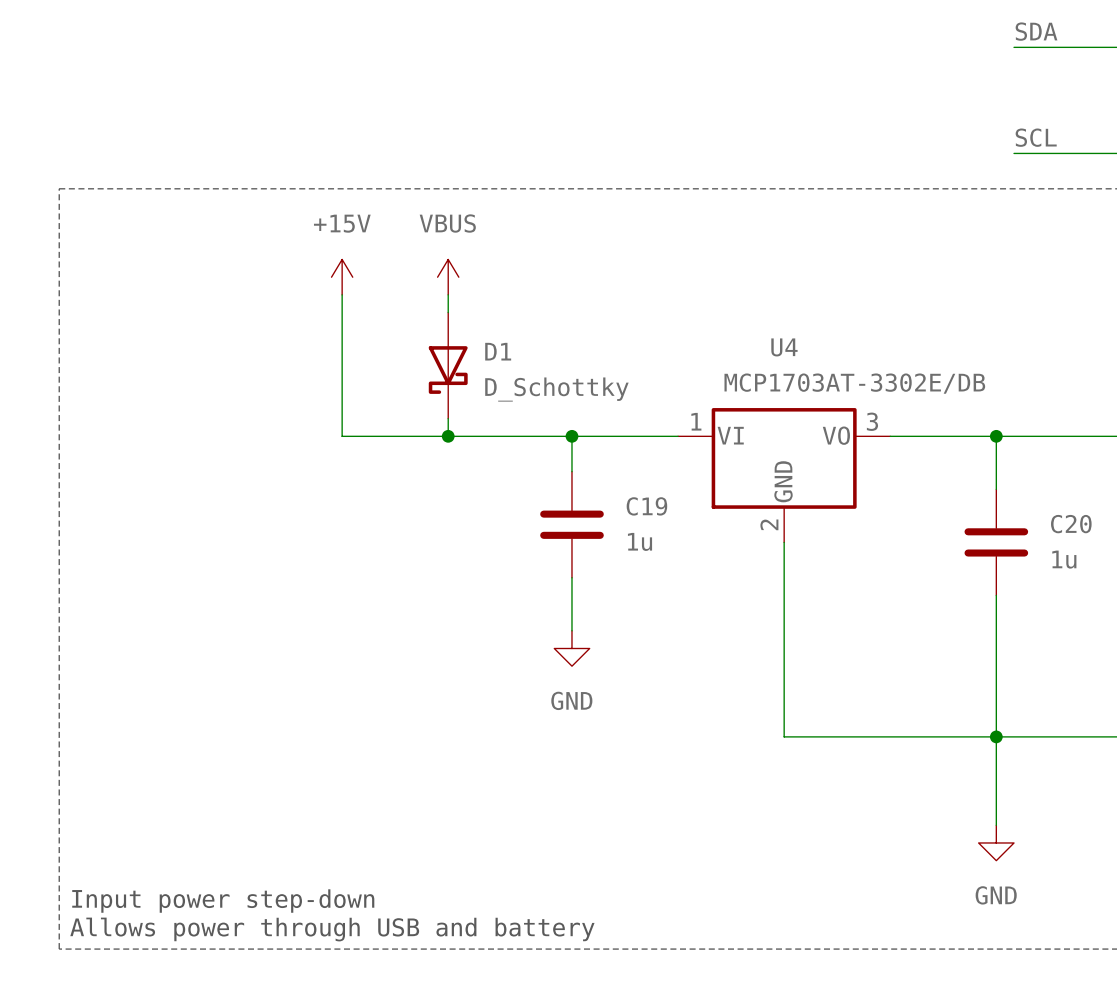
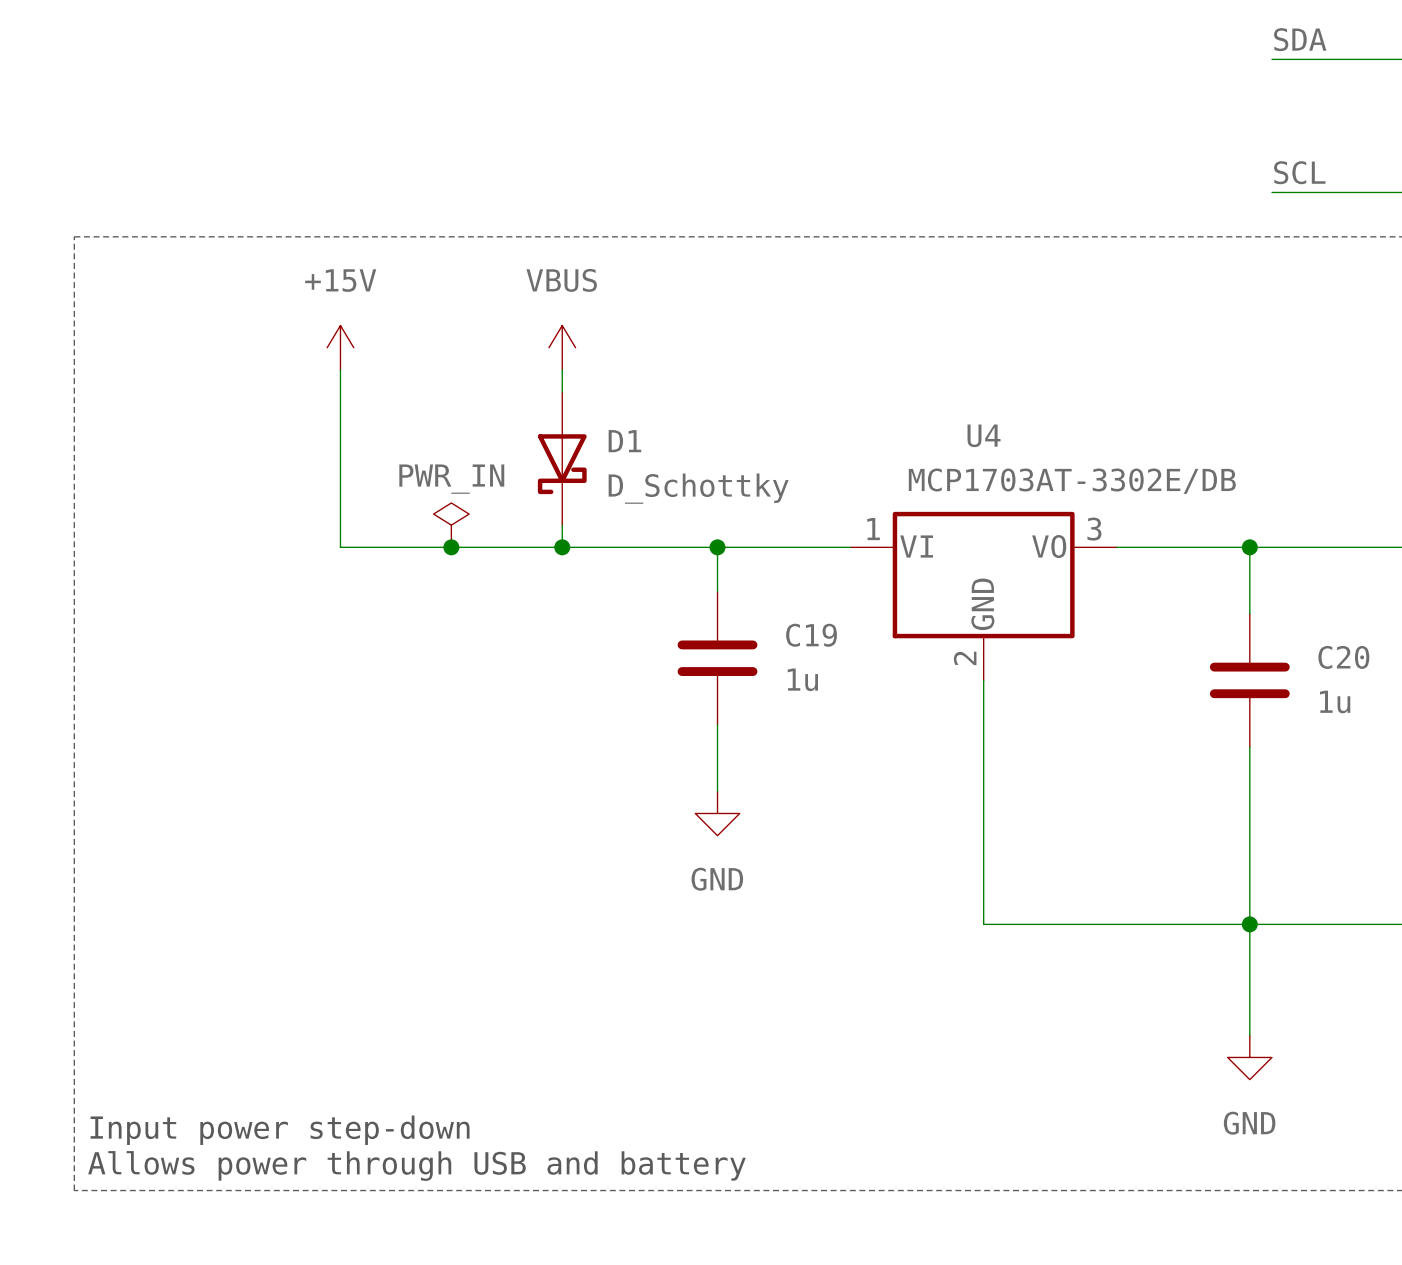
power symbol position: +15V (342, 277) -> +15V (340, 347)
wire: (342, 294) (342, 436) -> (340, 369) (340, 547) (429, 547)
power symbol: none -> PWR_IN (451, 525)
junction: none -> (451, 547)

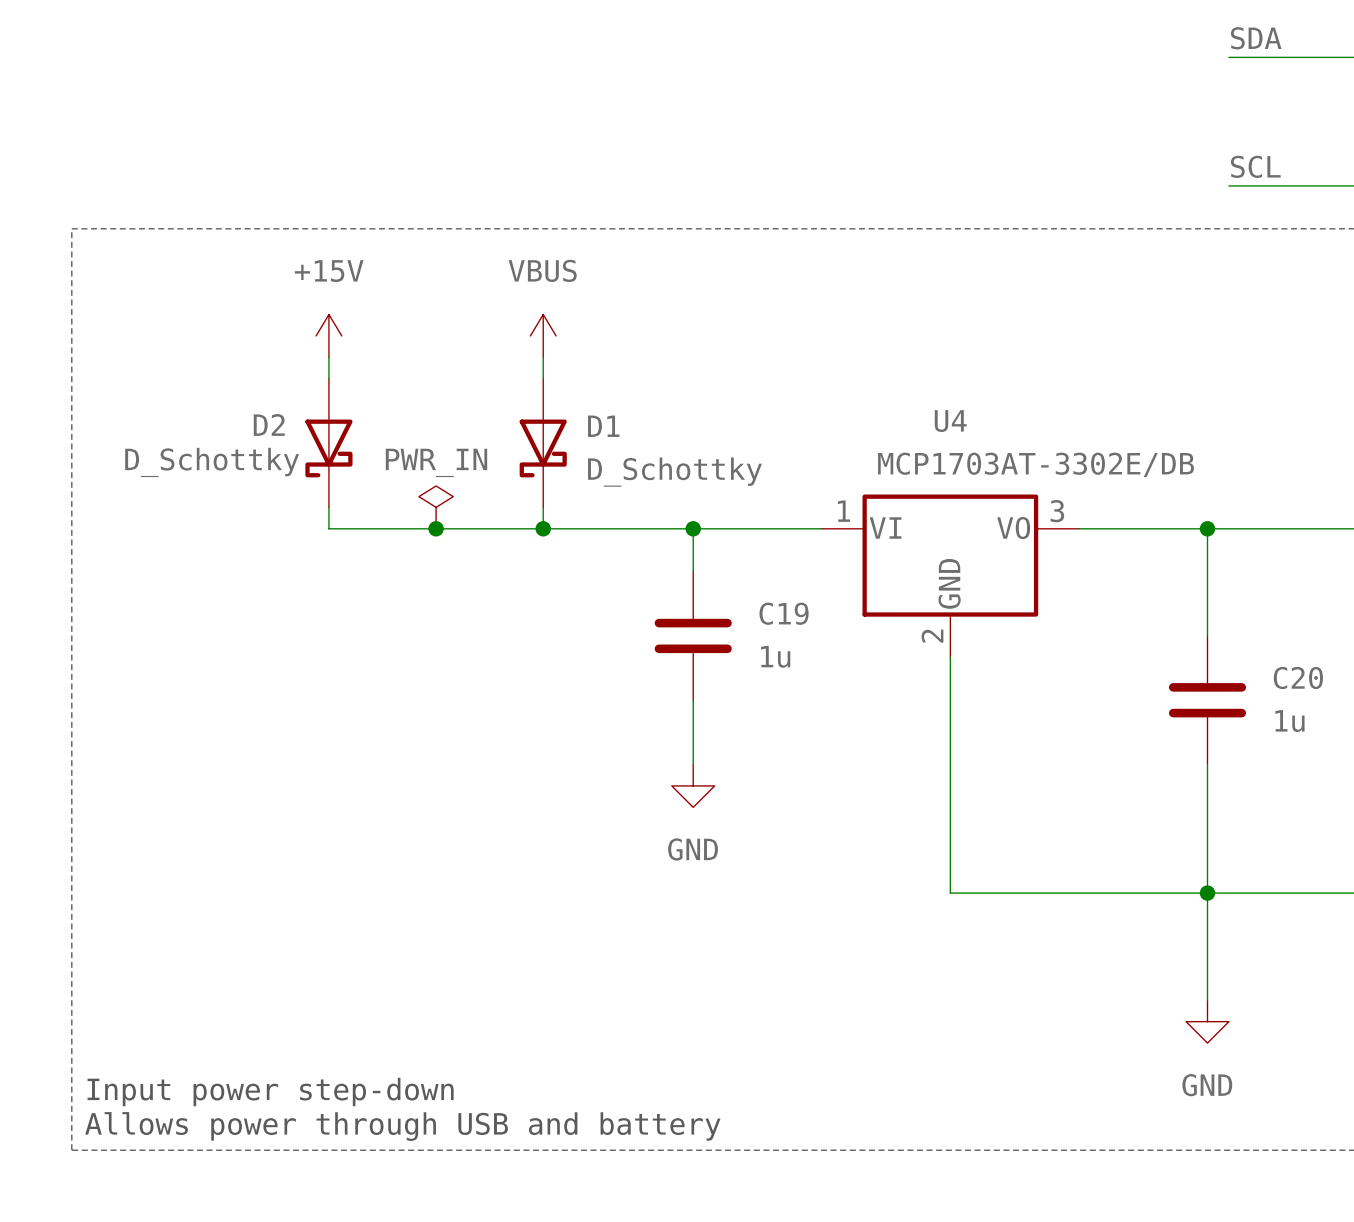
D2: none -> D_Schottky (328, 443)
C20 position: (1249, 680) -> (1207, 700)

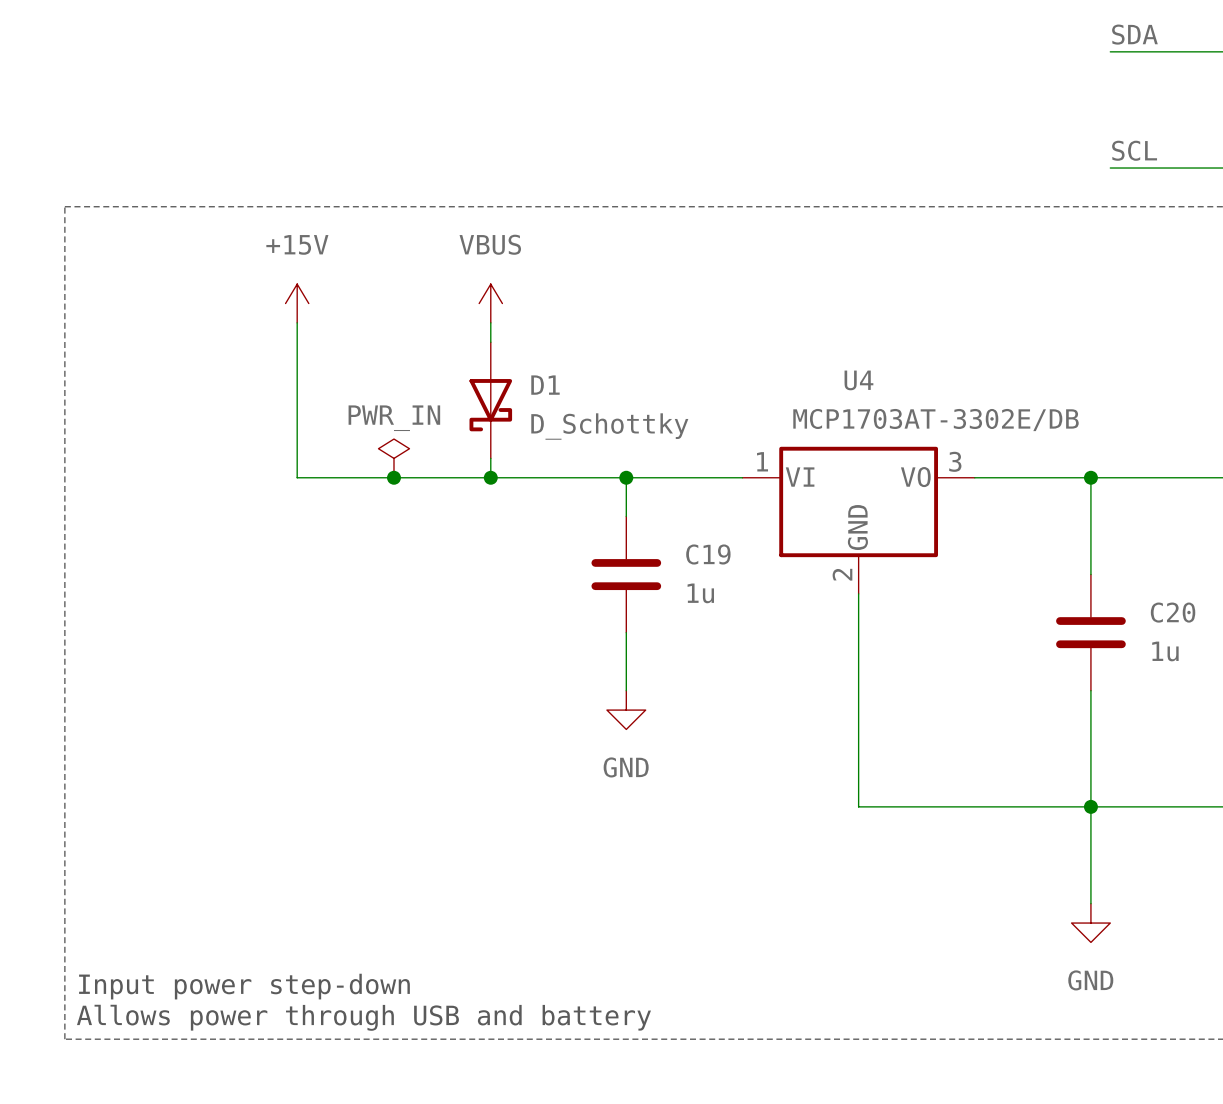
D2: D_Schottky (328, 443) -> none

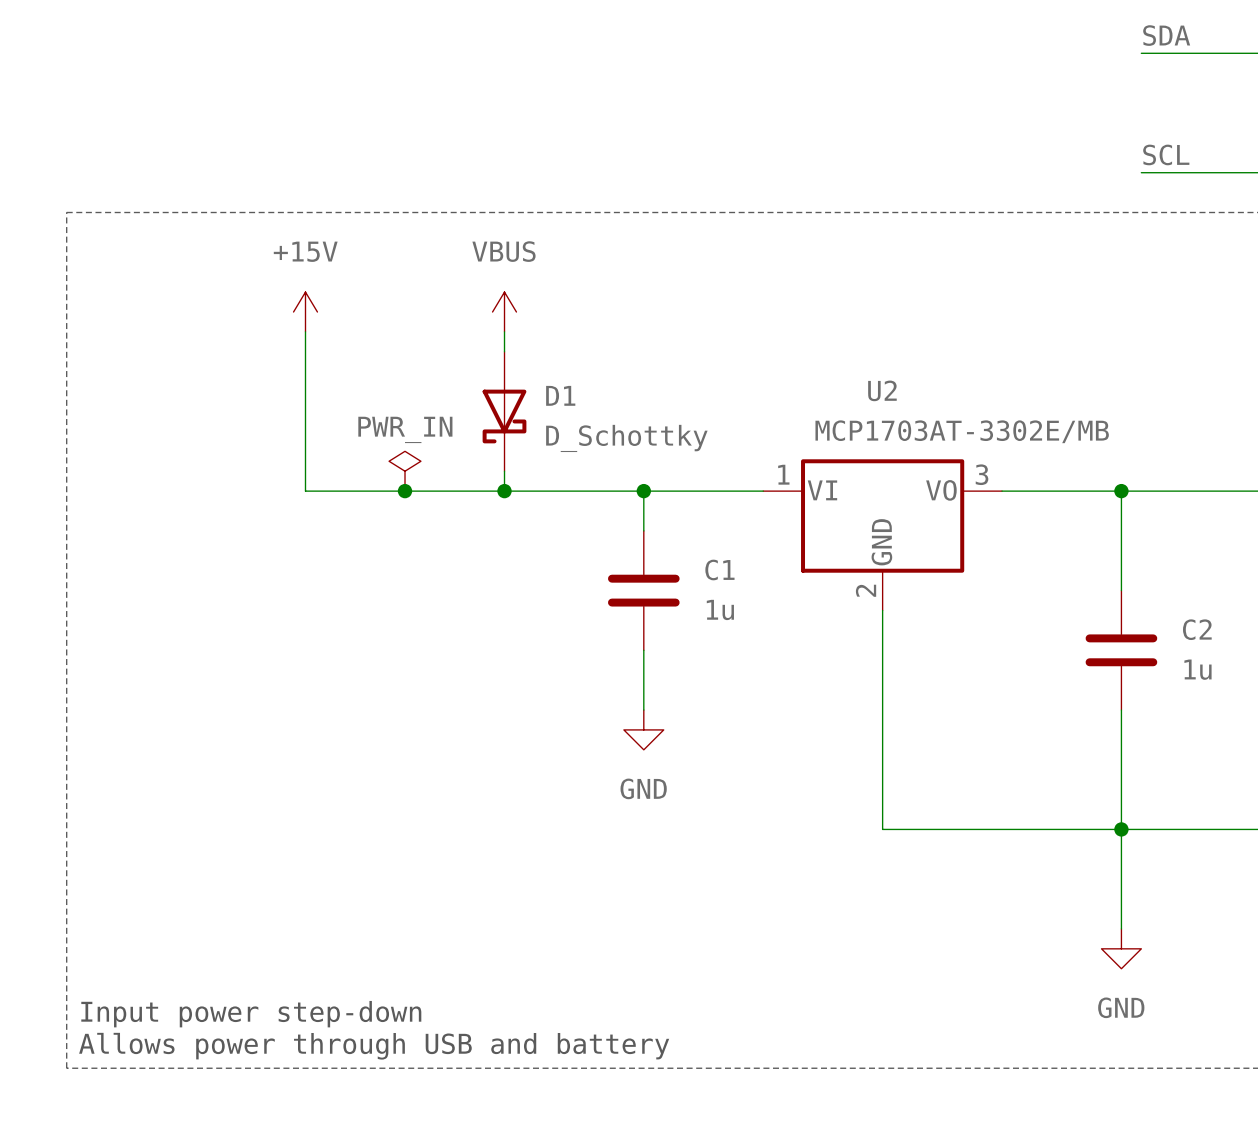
U4 name: U4 (858, 380) -> U2 (882, 390)
U4 value: MCP1703AT-3302E/DB (936, 420) -> MCP1703AT-3302E/MB (962, 431)
C19 name: C19 (708, 554) -> C1 (719, 569)
C20 name: C20 (1173, 612) -> C2 (1197, 629)

